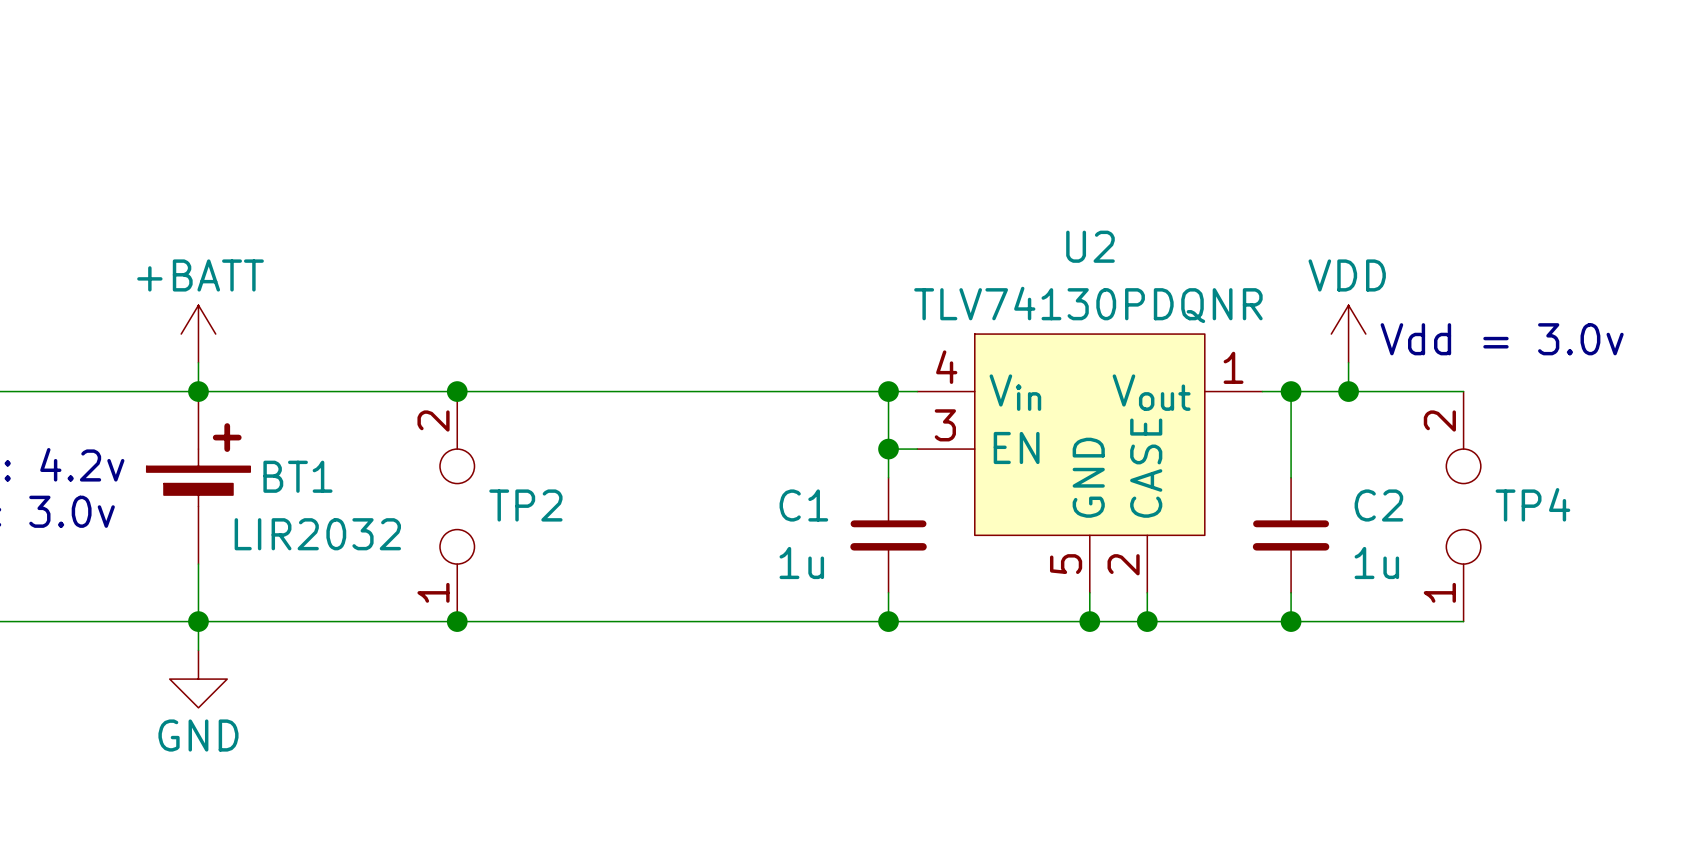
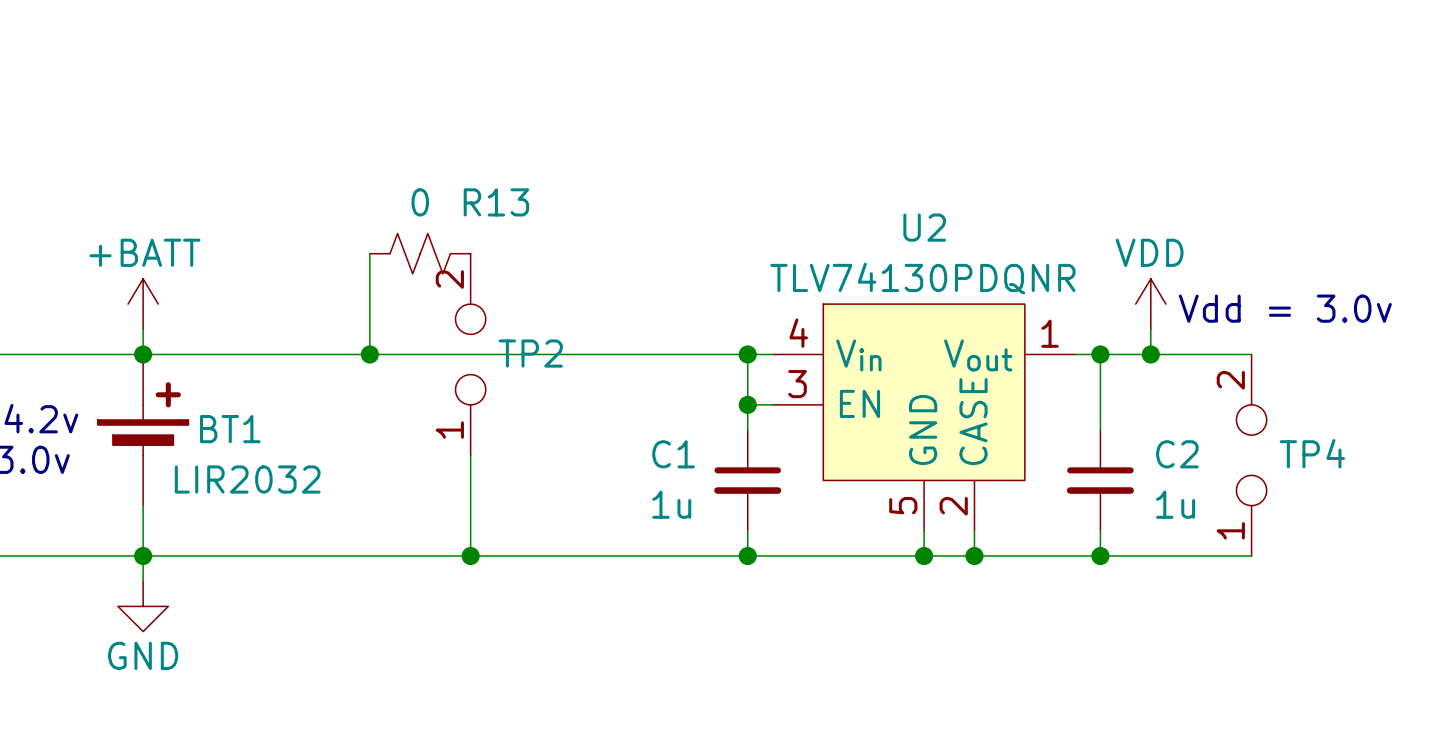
wire: none -> (369, 253) (369, 354)
R13: none -> 0 (420, 253)
TP2 position: (457, 506) -> (470, 354)
wire: none -> (470, 455) (470, 556)
junction position: (457, 621) -> (470, 556)

